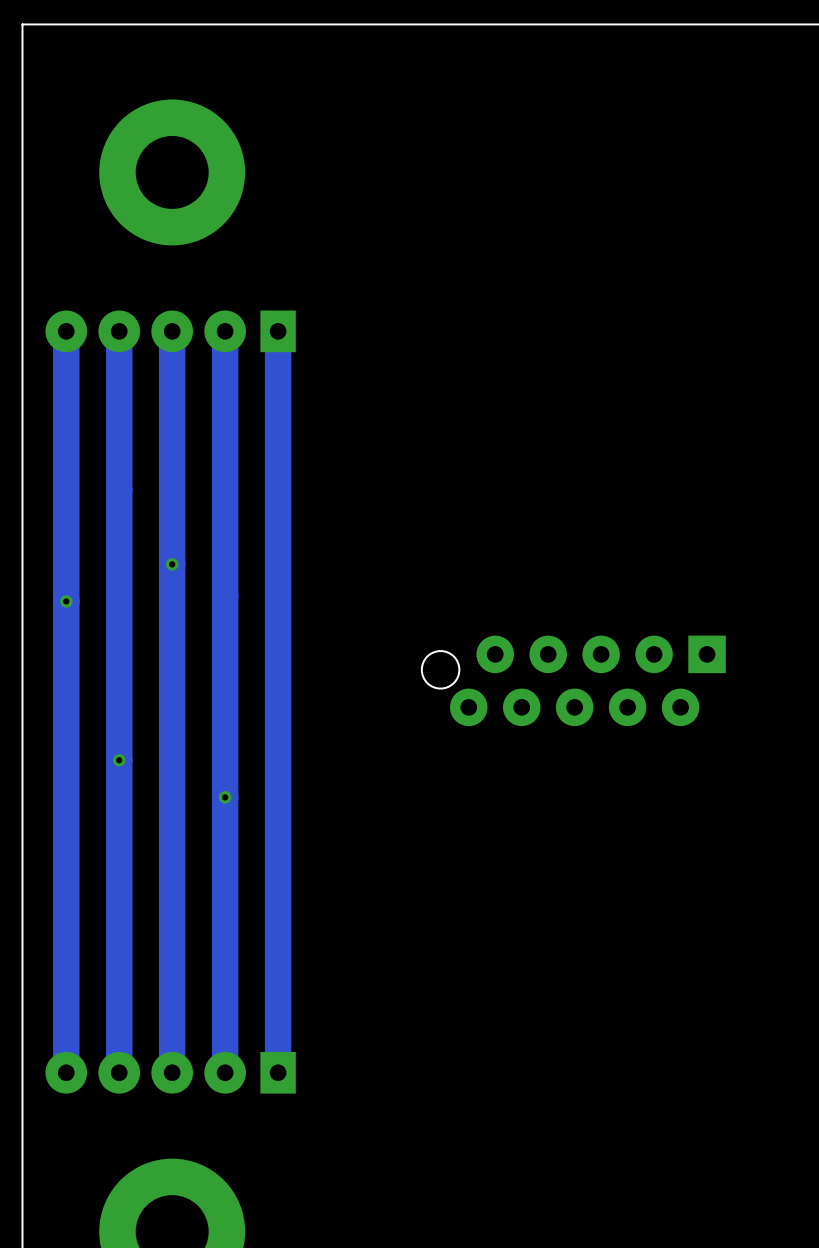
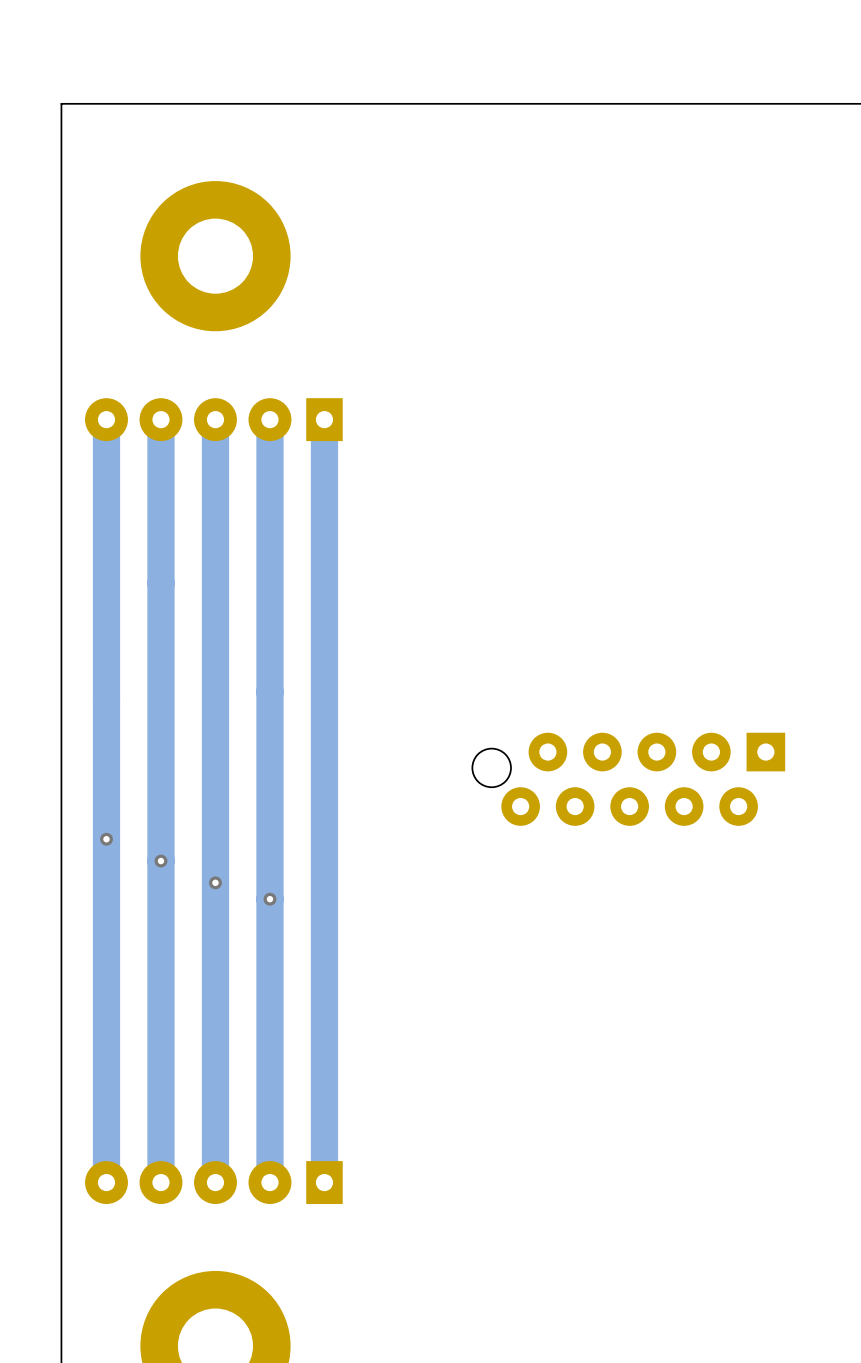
via: (172, 564) -> none
via: (66, 601) -> none
via: none -> (106, 839)
via: none -> (215, 882)

